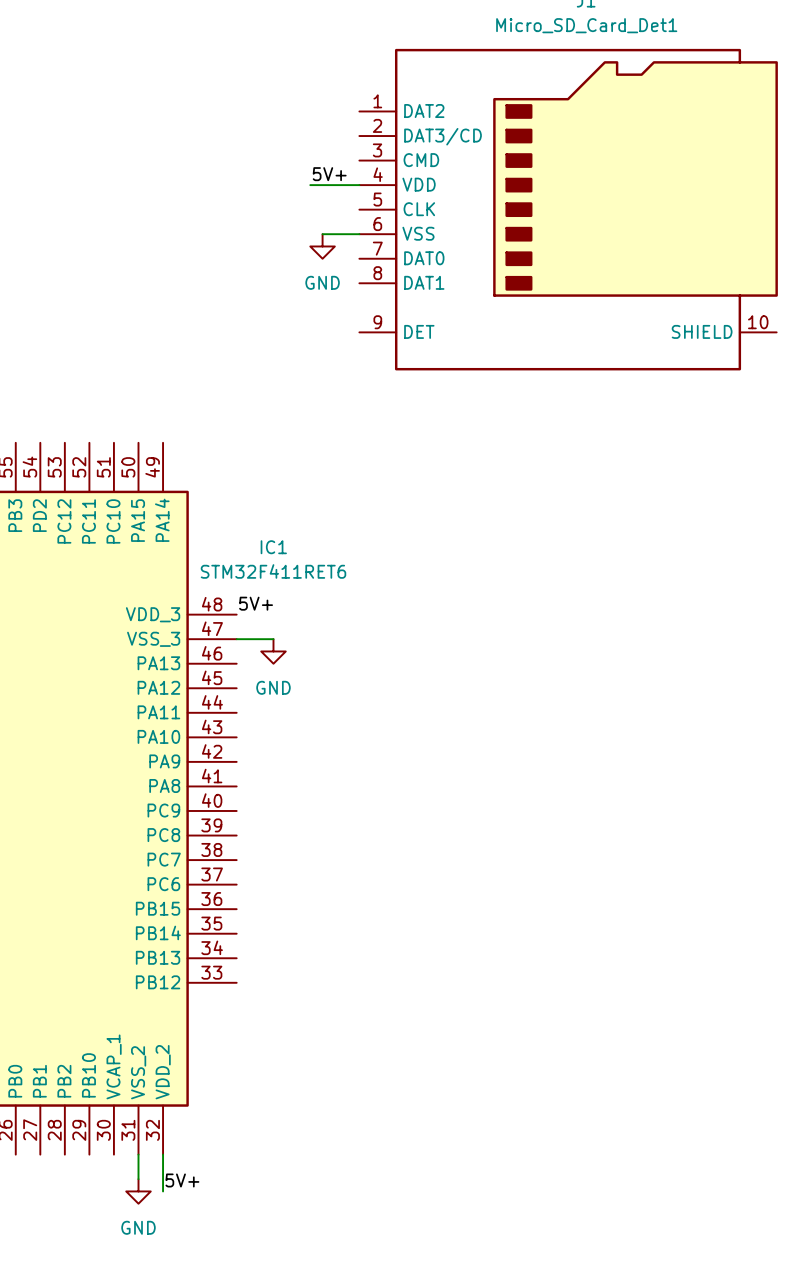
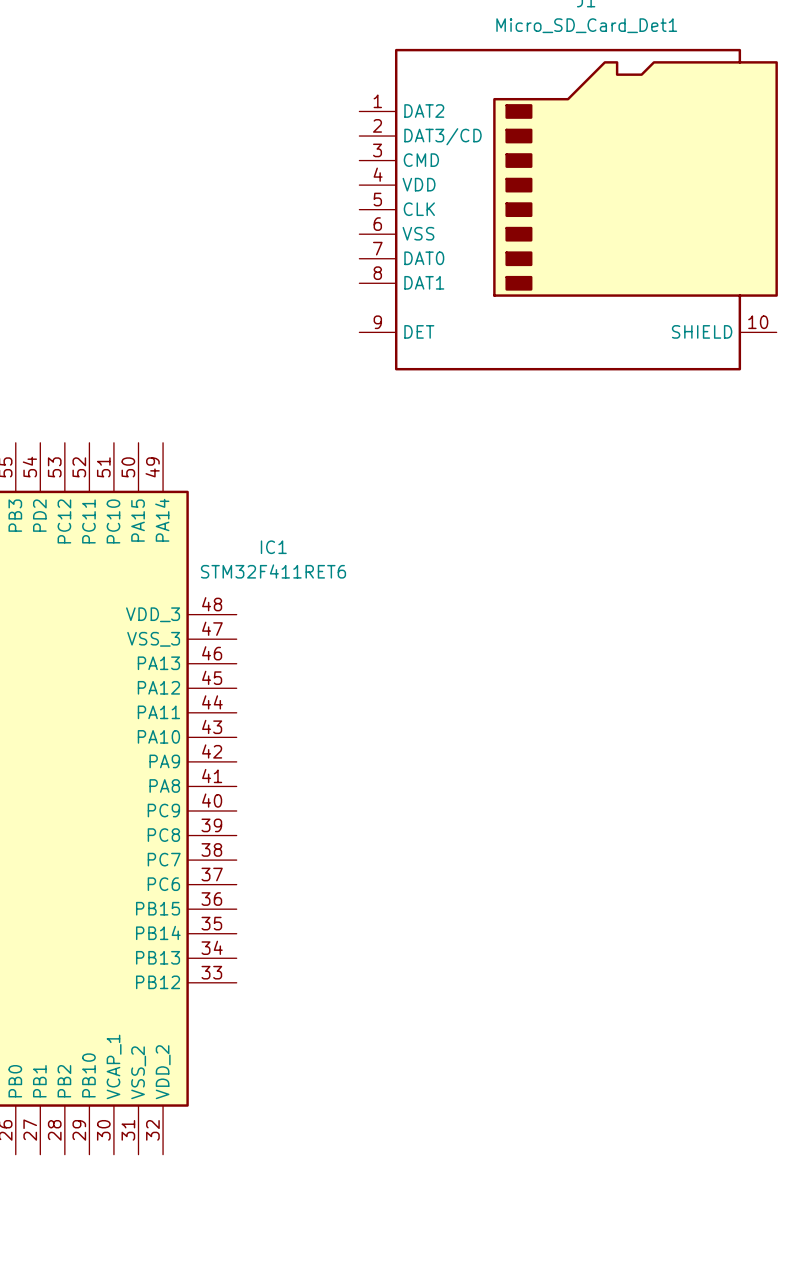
label: 5V+ (329, 174) -> none
wire: (310, 185) (359, 185) -> none
wire: (322, 234) (359, 234) -> none
power symbol: GND (322, 246) -> none
label: 5V+ (256, 603) -> none
wire: (236, 639) (273, 639) -> none
power symbol: GND (273, 651) -> none
wire: (138, 1154) (138, 1179) -> none
wire: (163, 1154) (163, 1191) -> none
label: 5V+ (182, 1180) -> none
power symbol: GND (138, 1191) -> none

